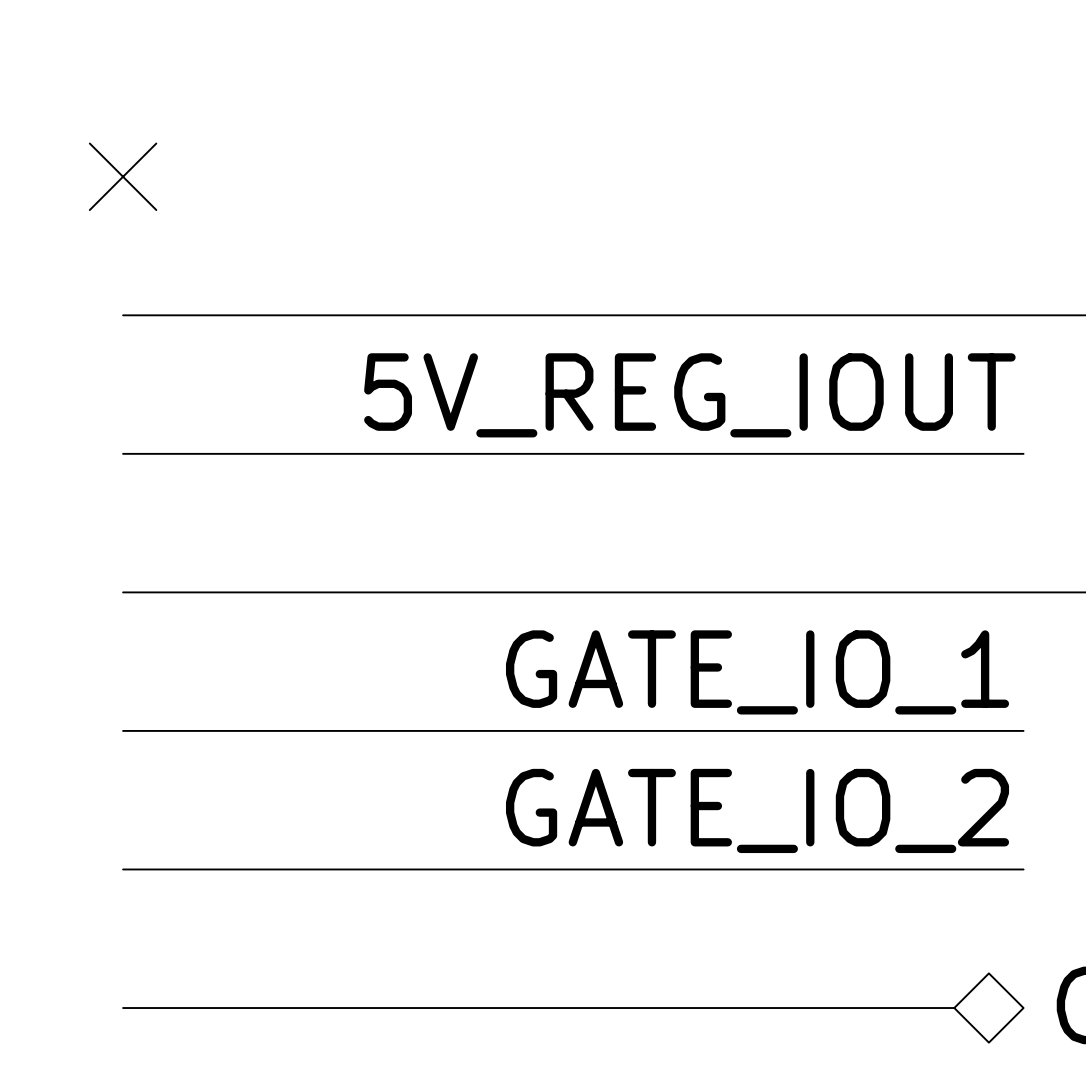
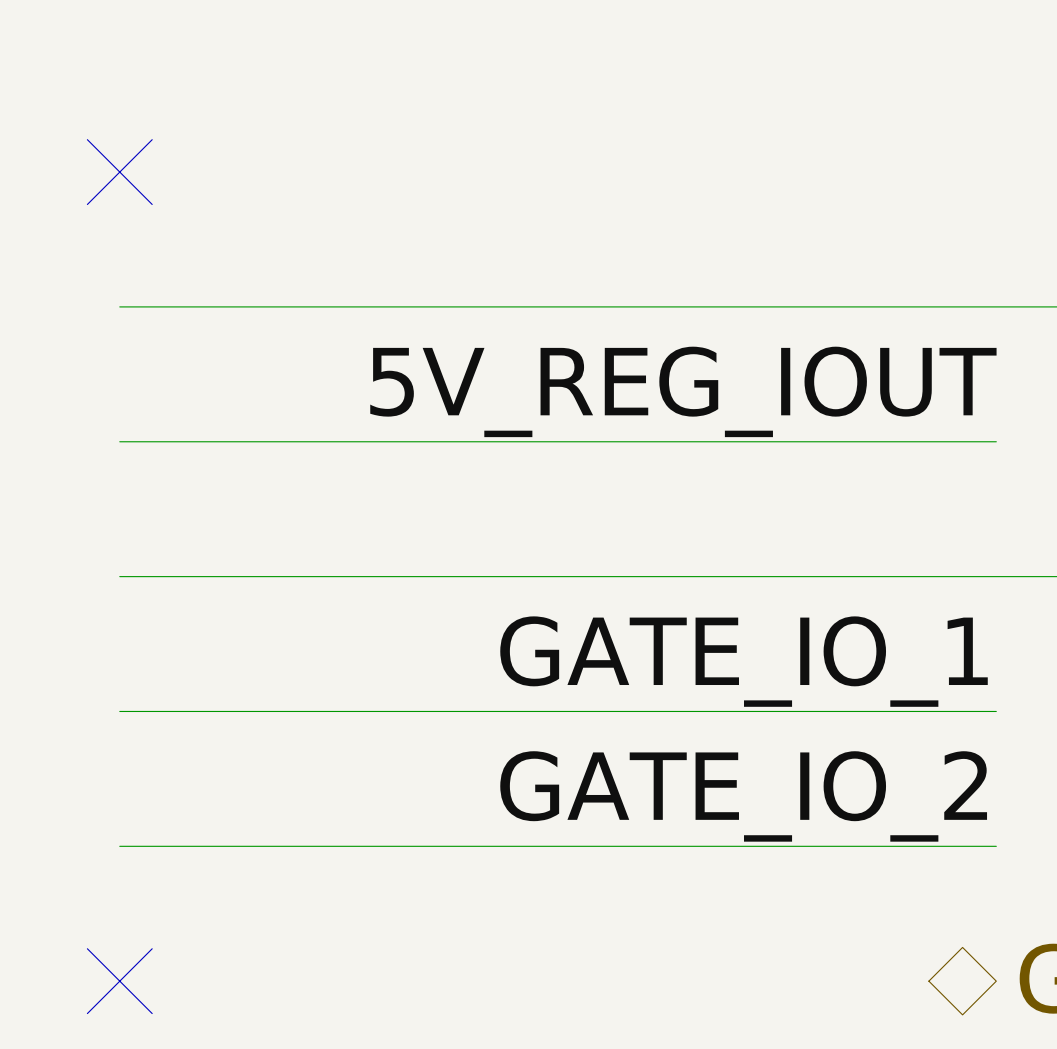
wire: (123, 1008) (954, 1008) -> none
no-connect mark: none -> (119, 981)

